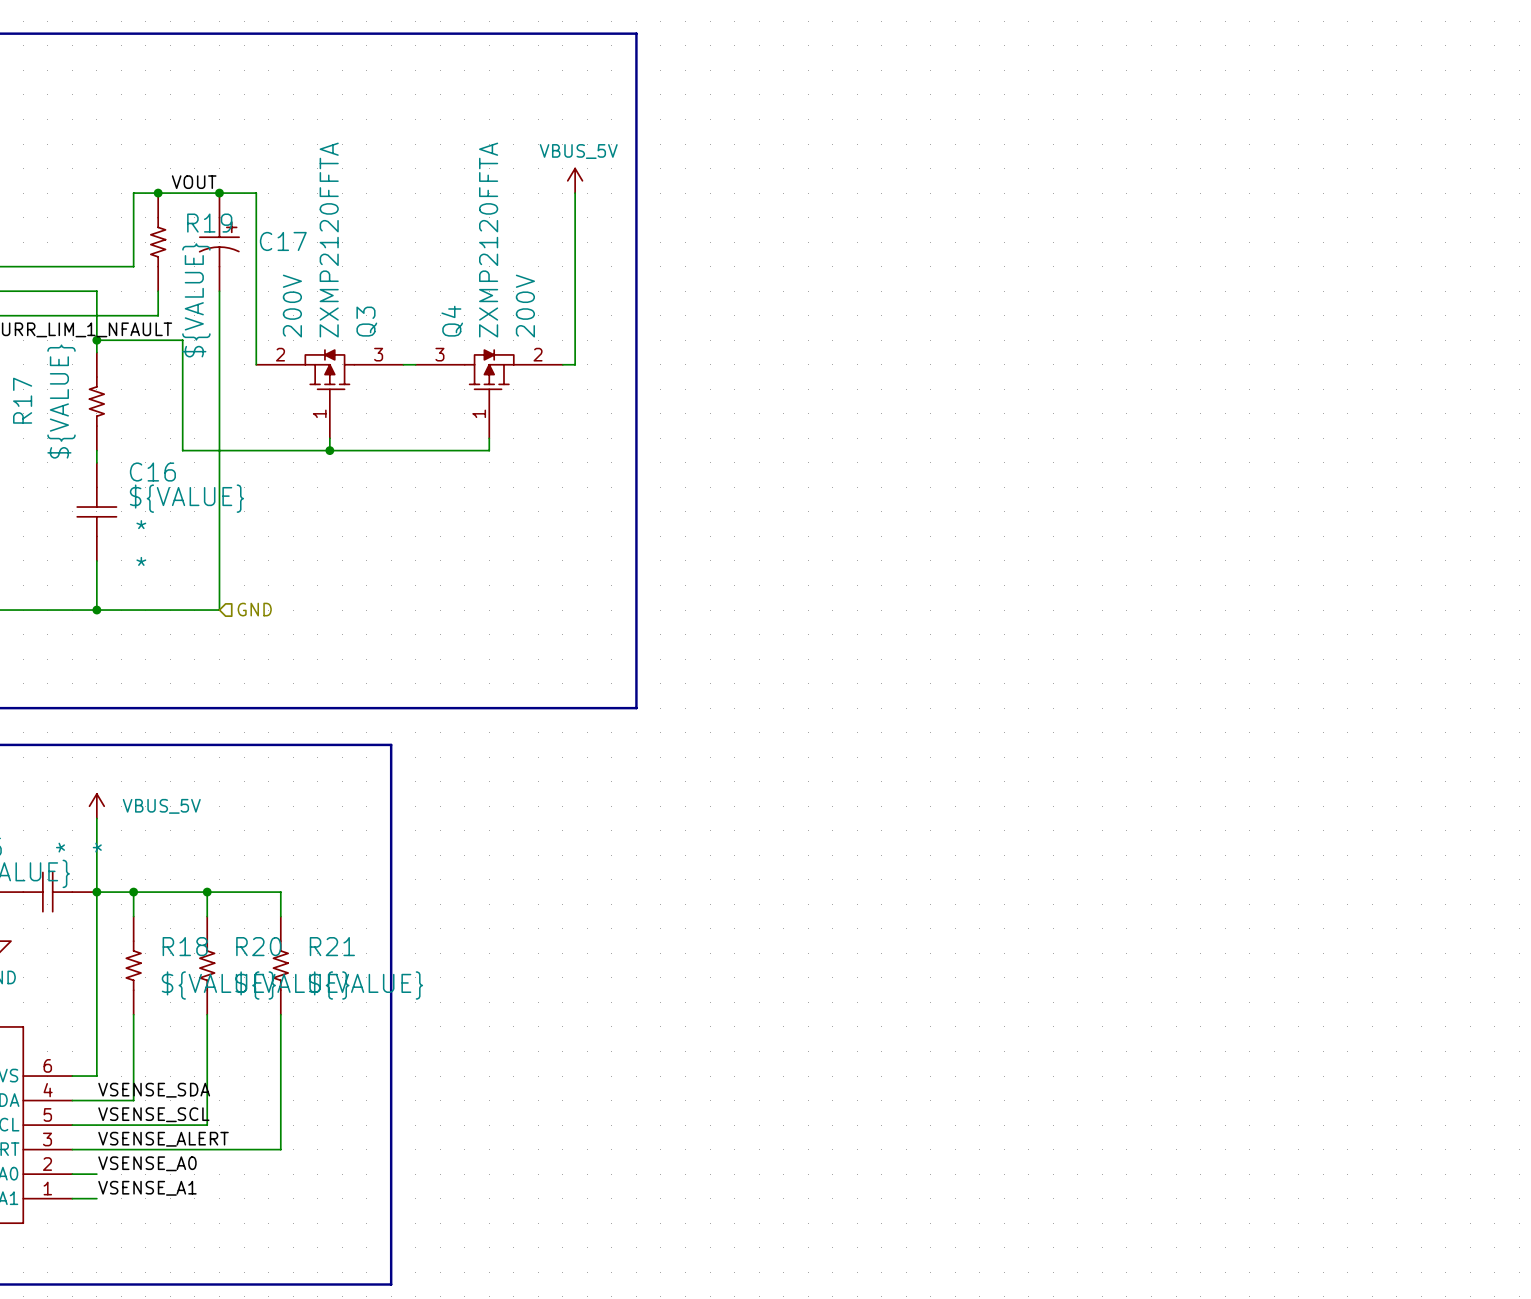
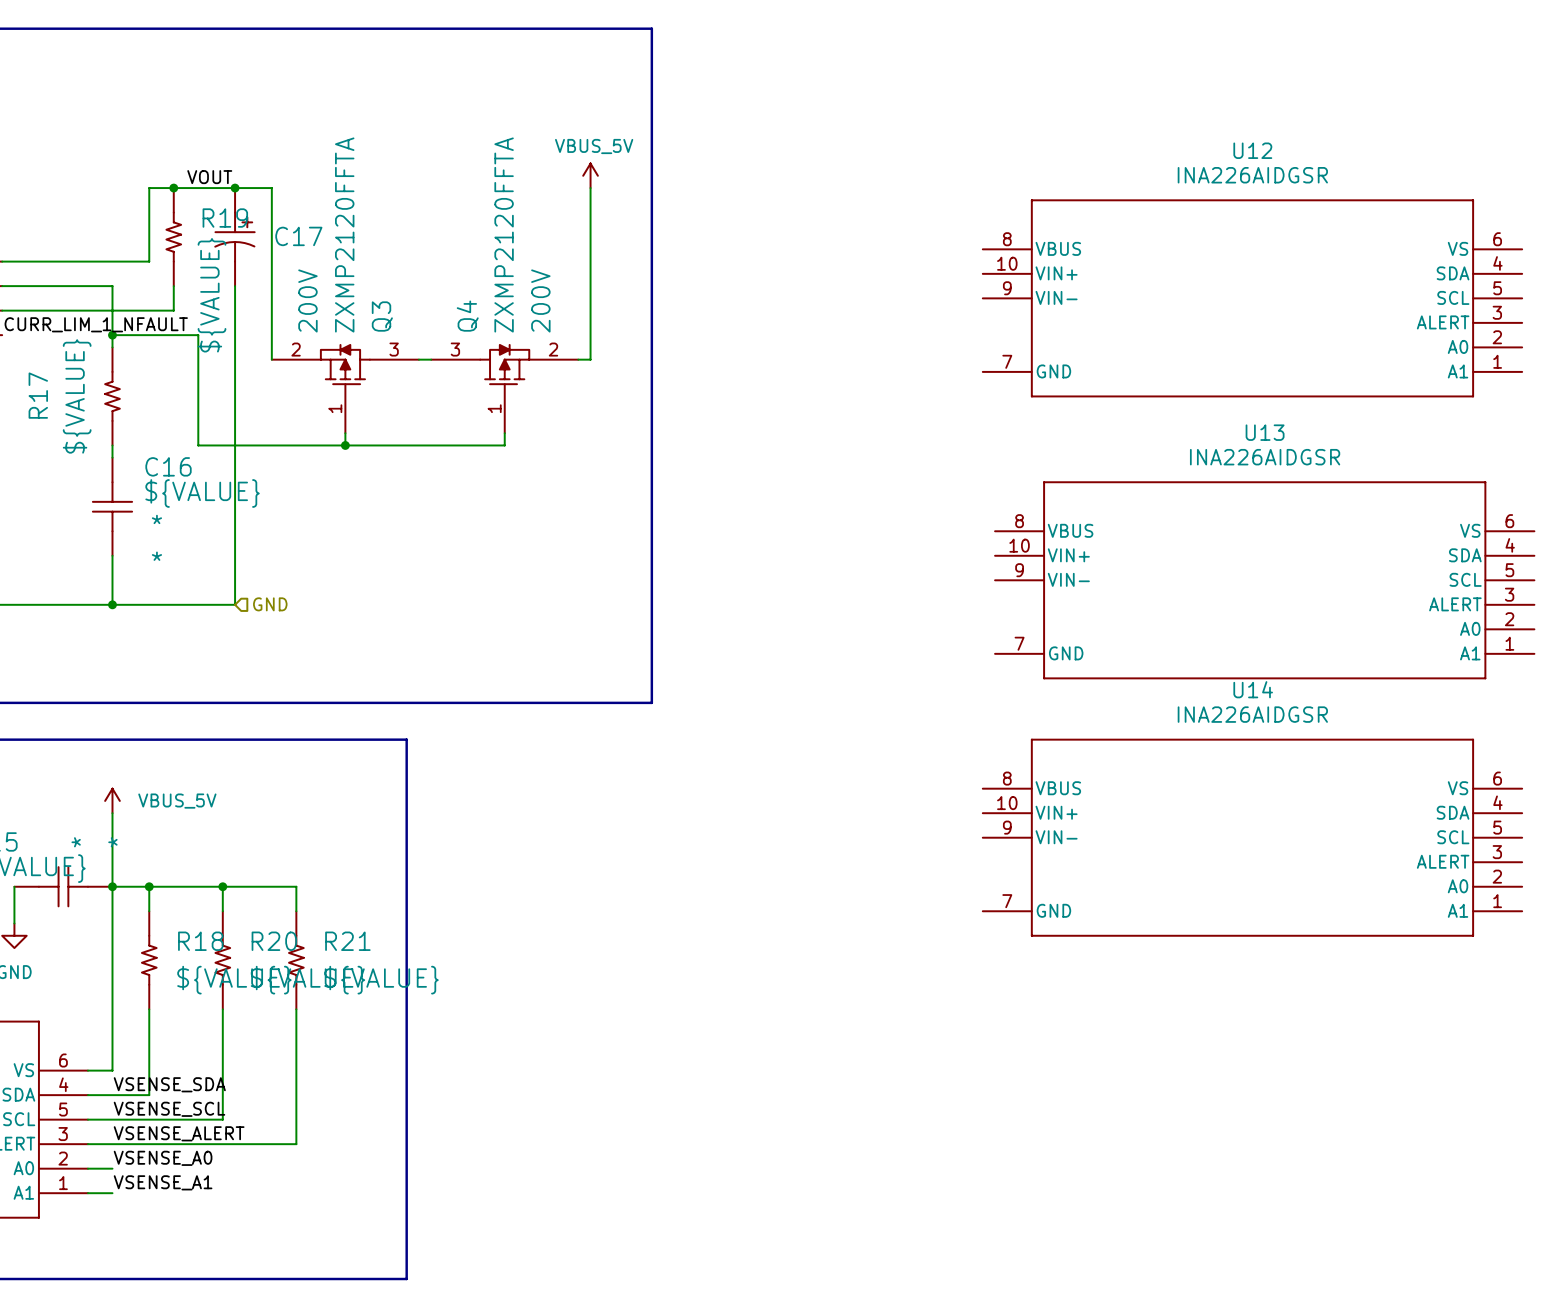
U12: none -> INA226AIDGSR (1252, 298)
U13: none -> INA226AIDGSR (1264, 580)
U14: none -> INA226AIDGSR (1252, 837)

